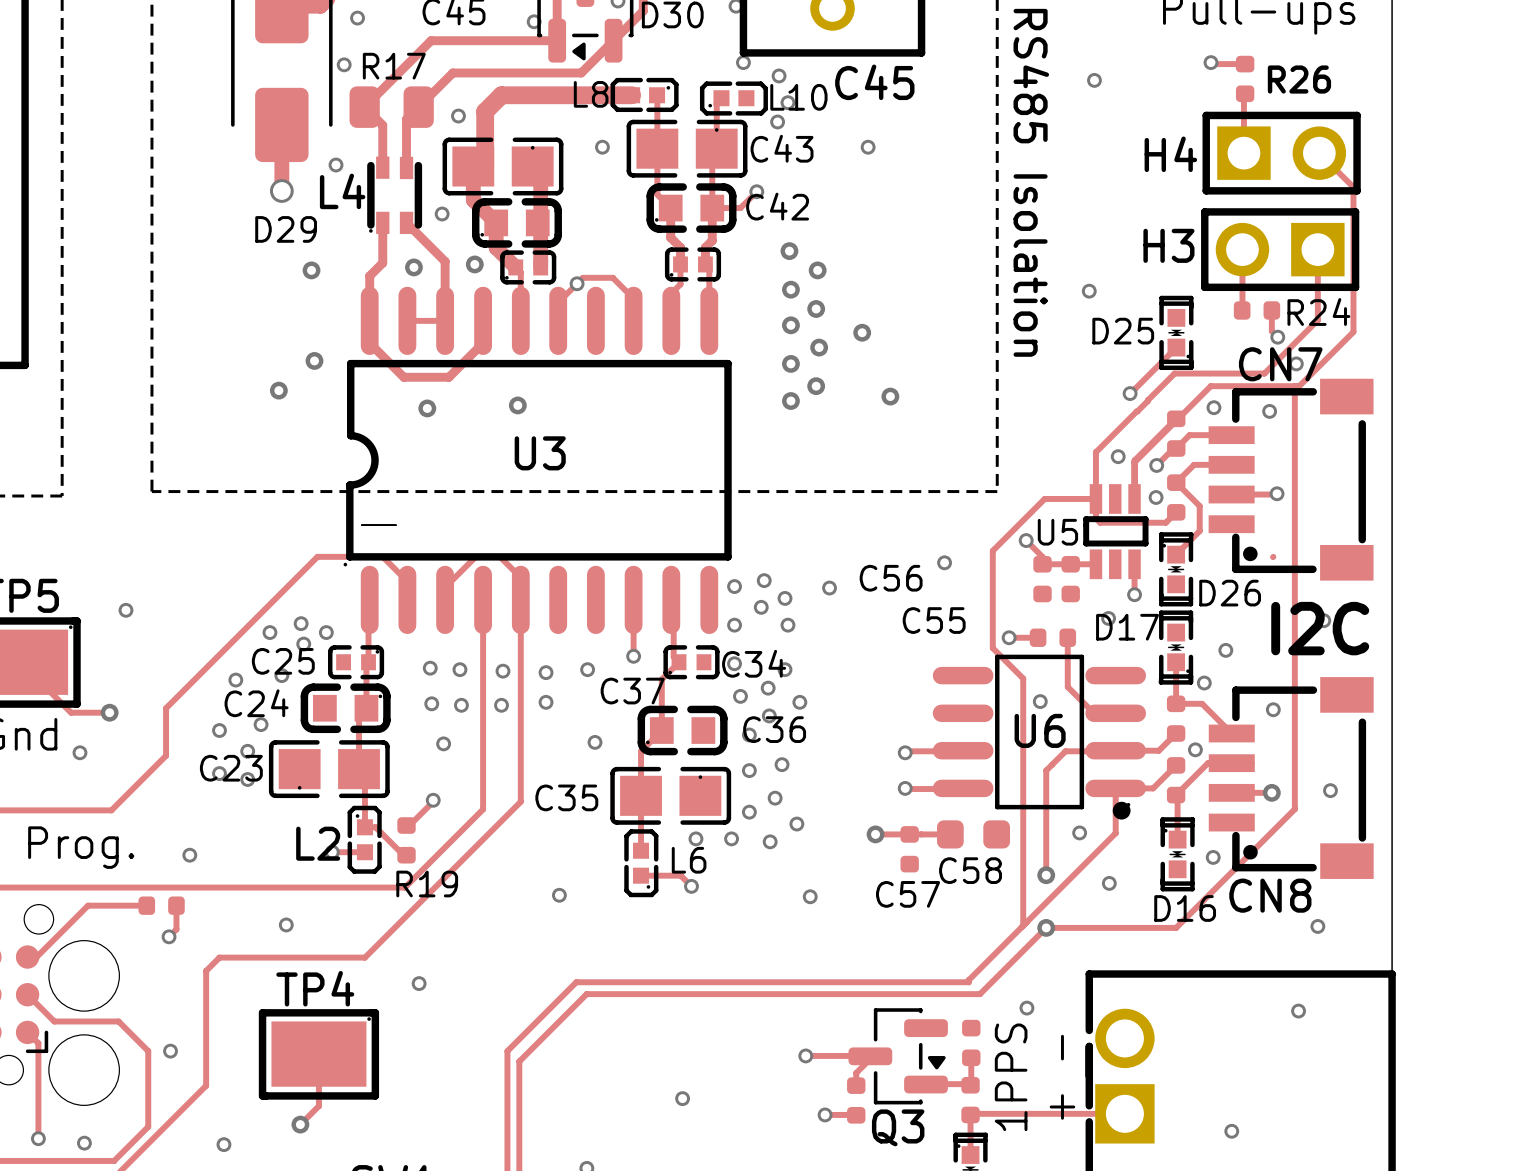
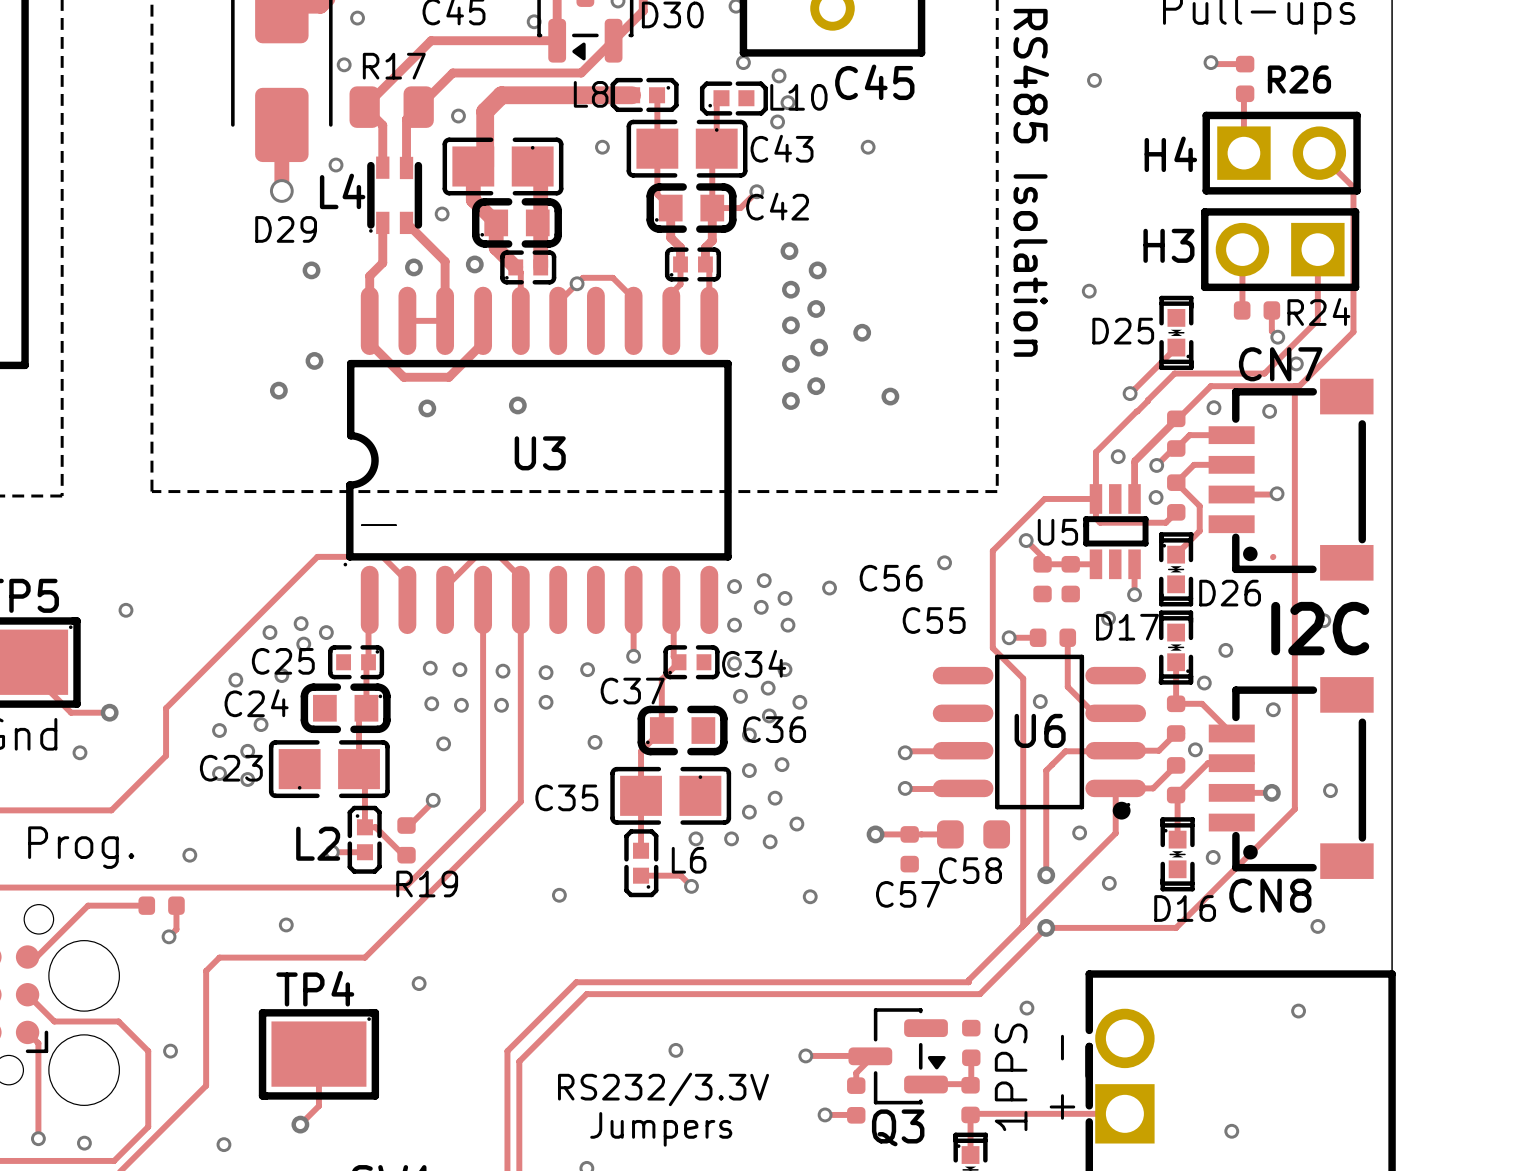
text: none -> RS232/3.3V (663, 1089)
via position: (682, 1098) -> (675, 1050)
text: none -> Jumpers (661, 1129)

